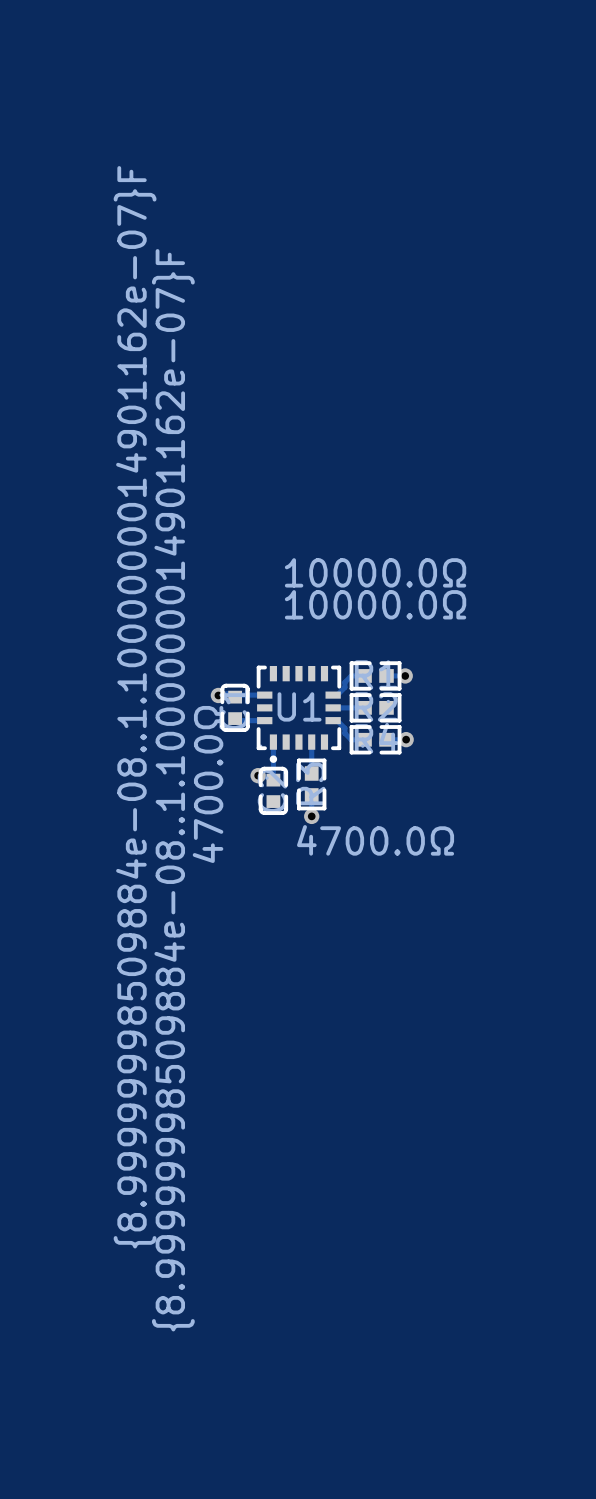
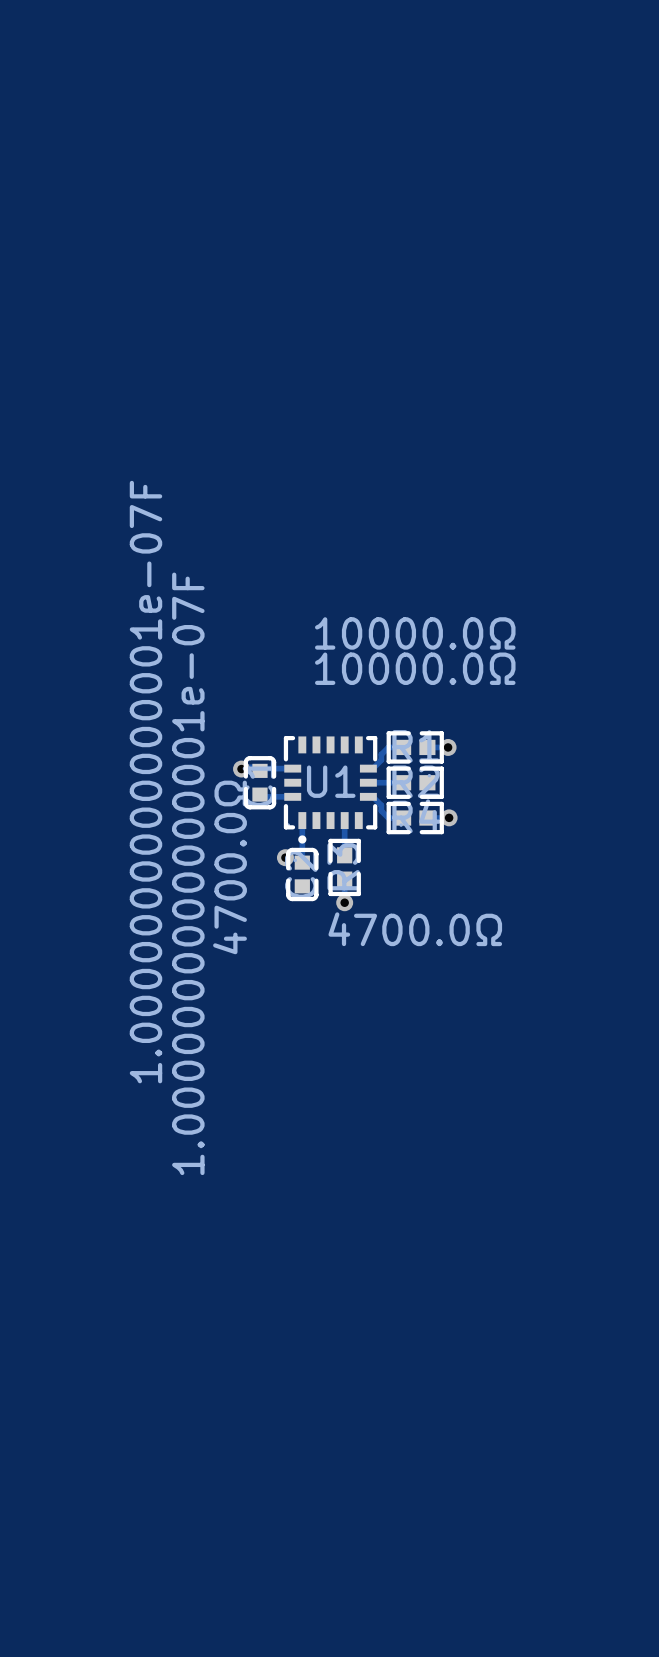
part value: {8.99999998509884e-08..1.1000000014901162e-07}F (135, 707) -> 1.0000000000000001e-07F (145, 782)
part value: {8.99999998509884e-08..1.1000000014901162e-07}F (173, 790) -> 1.0000000000000001e-07F (188, 873)

